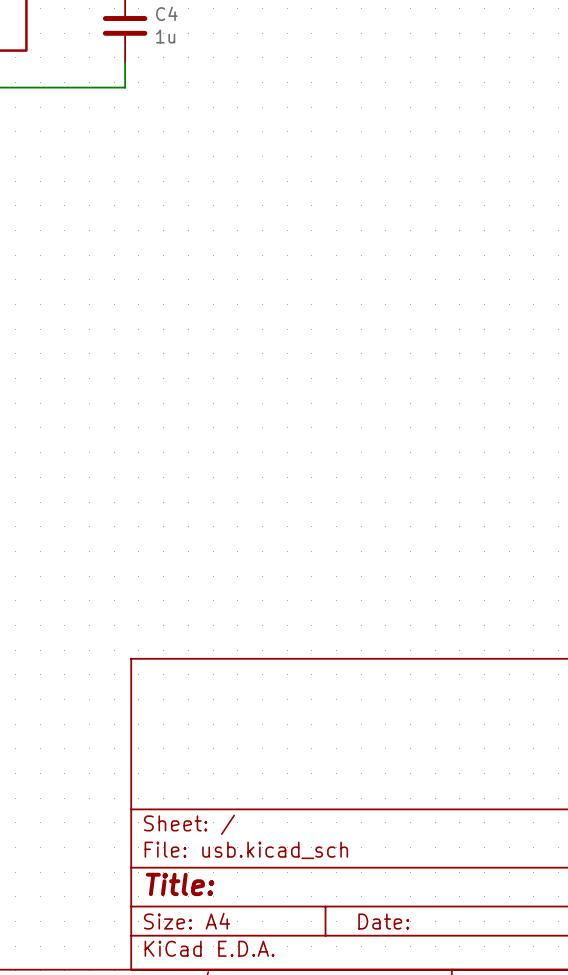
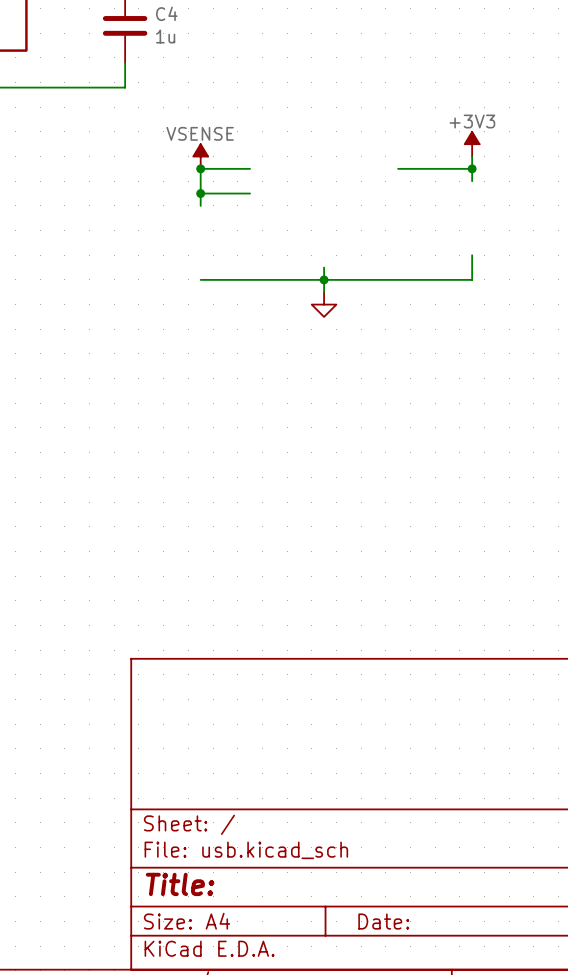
power symbol: none -> +3V3 (472, 144)
power symbol: none -> VSENSE (200, 156)
wire: none -> (472, 156) (472, 181)
junction: none -> (200, 168)
wire: none -> (250, 168) (200, 168) (200, 205)
wire: none -> (398, 168) (472, 168)
junction: none -> (472, 168)
wire: none -> (200, 193) (250, 193)
junction: none -> (200, 193)
wire: none -> (472, 255) (472, 279) (200, 279)
wire: none -> (324, 267) (324, 292)
junction: none -> (324, 279)
power symbol: none -> (324, 304)

